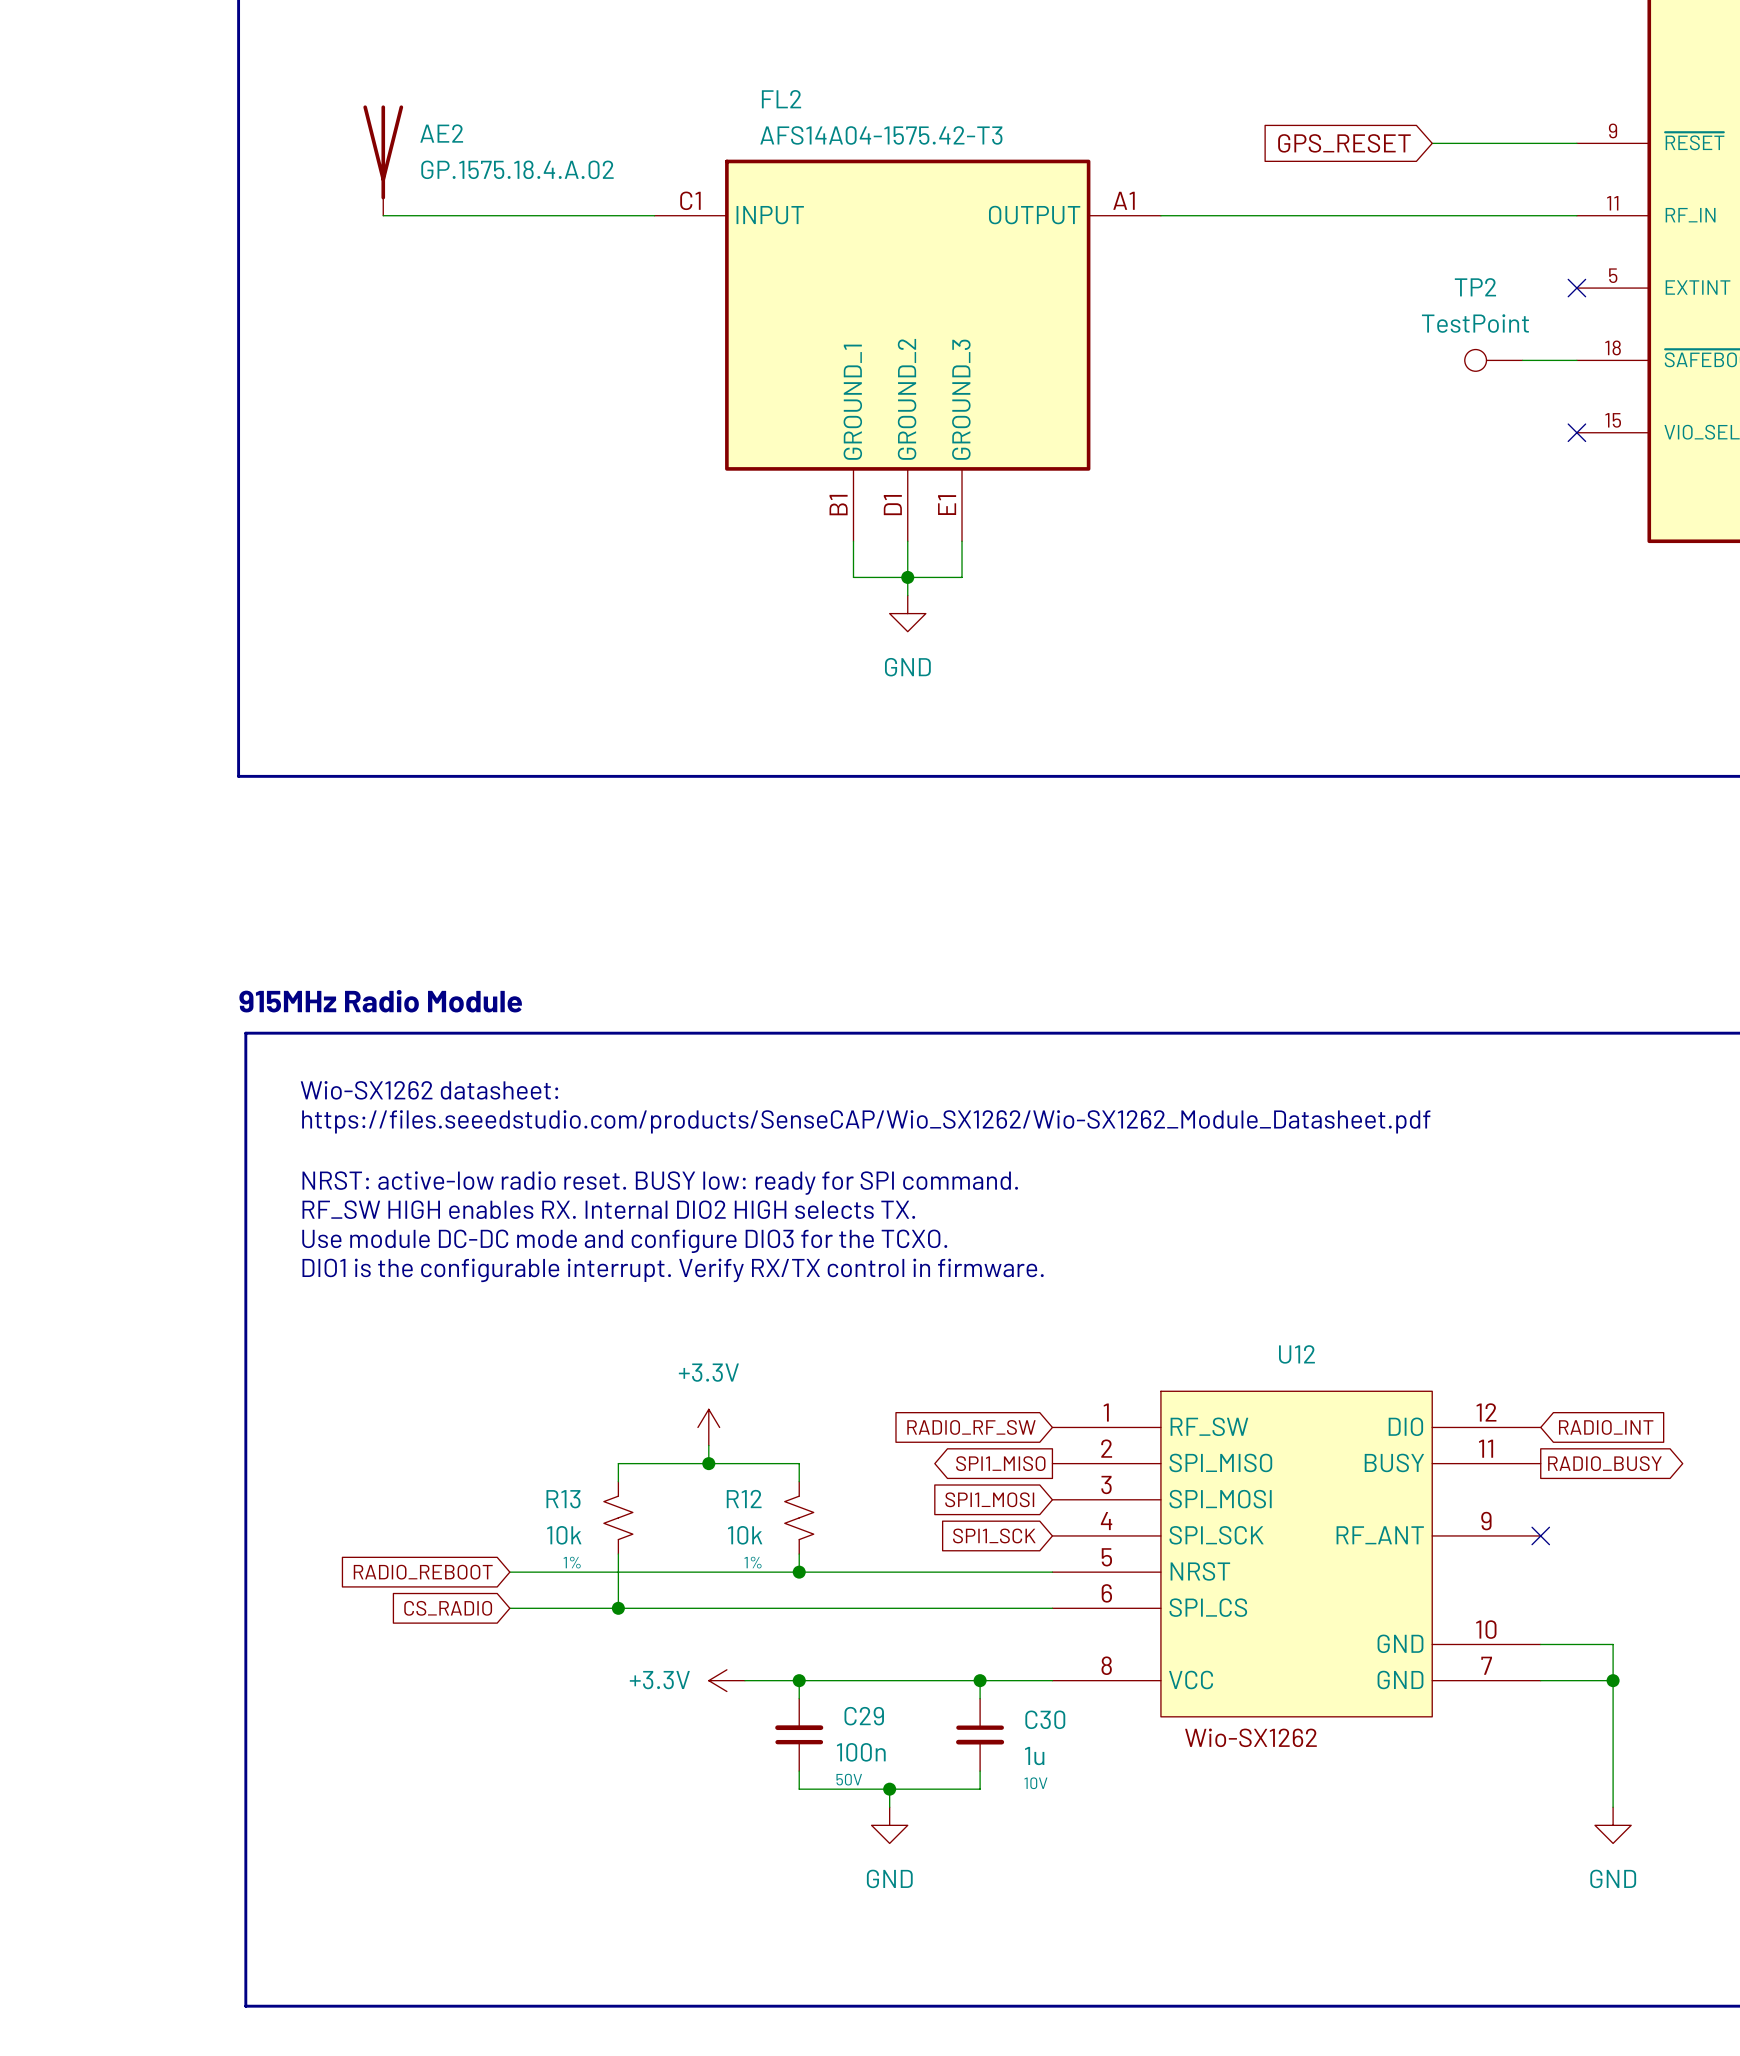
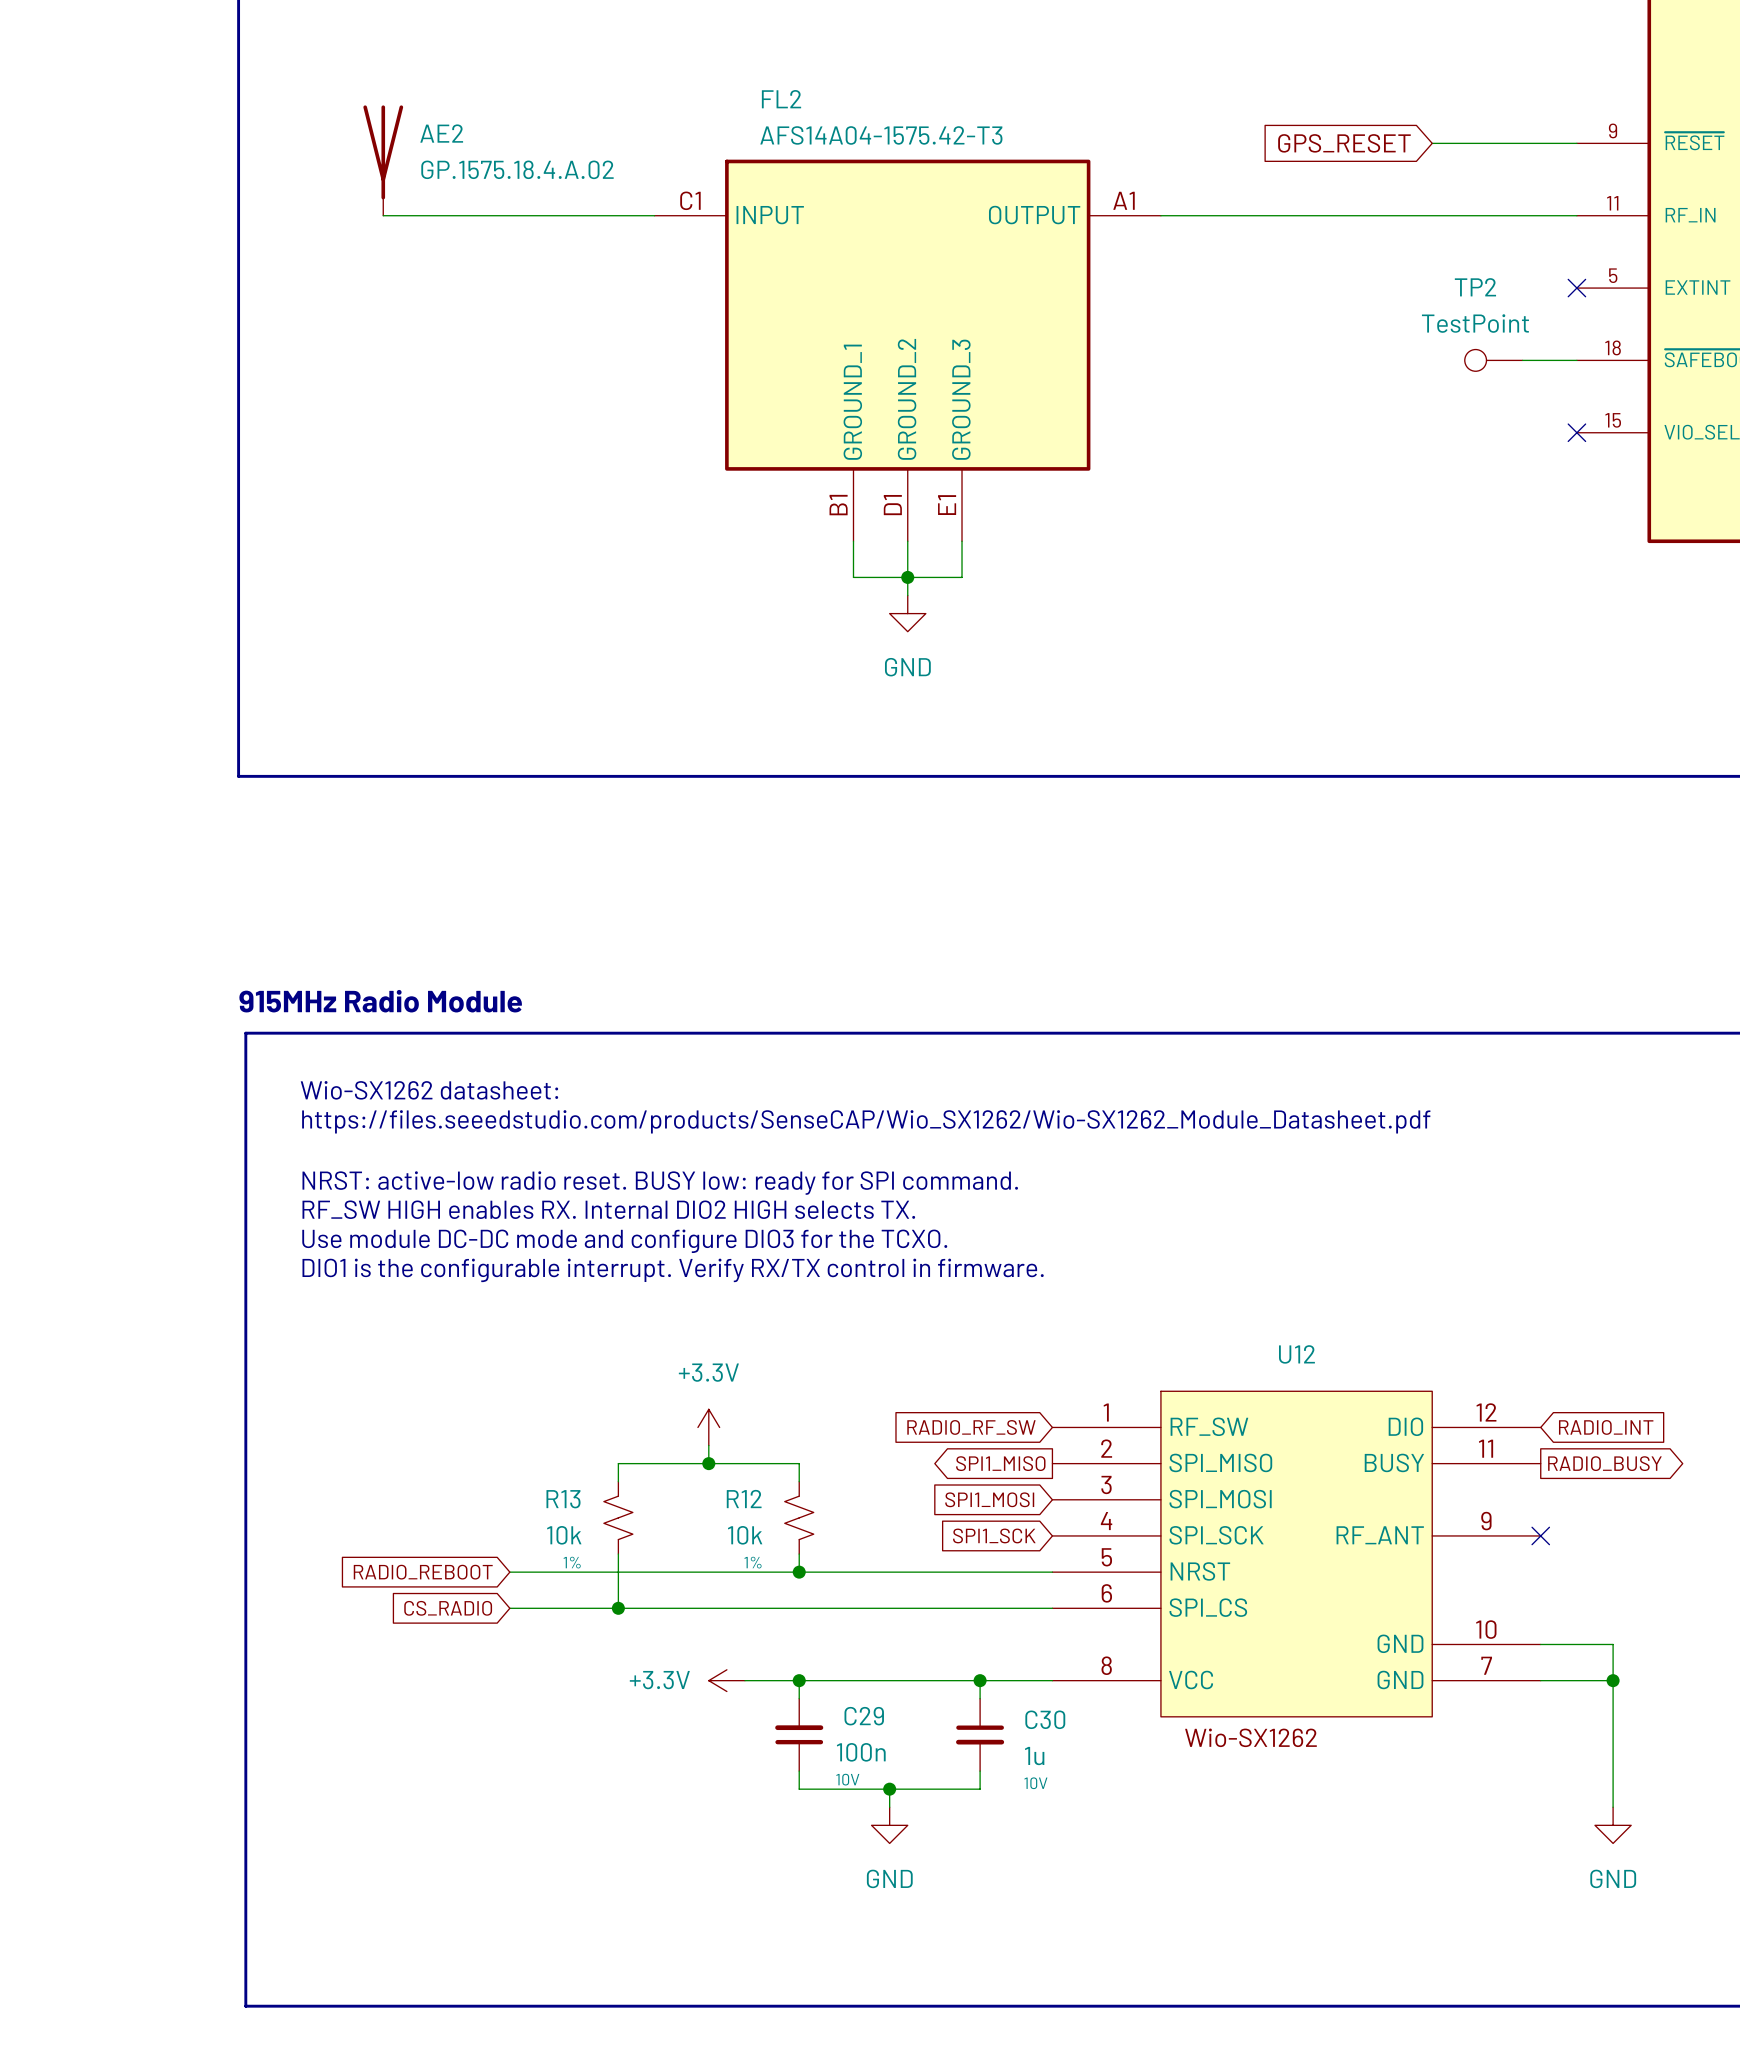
C29 text: 50V (849, 1779) -> 10V (847, 1779)

